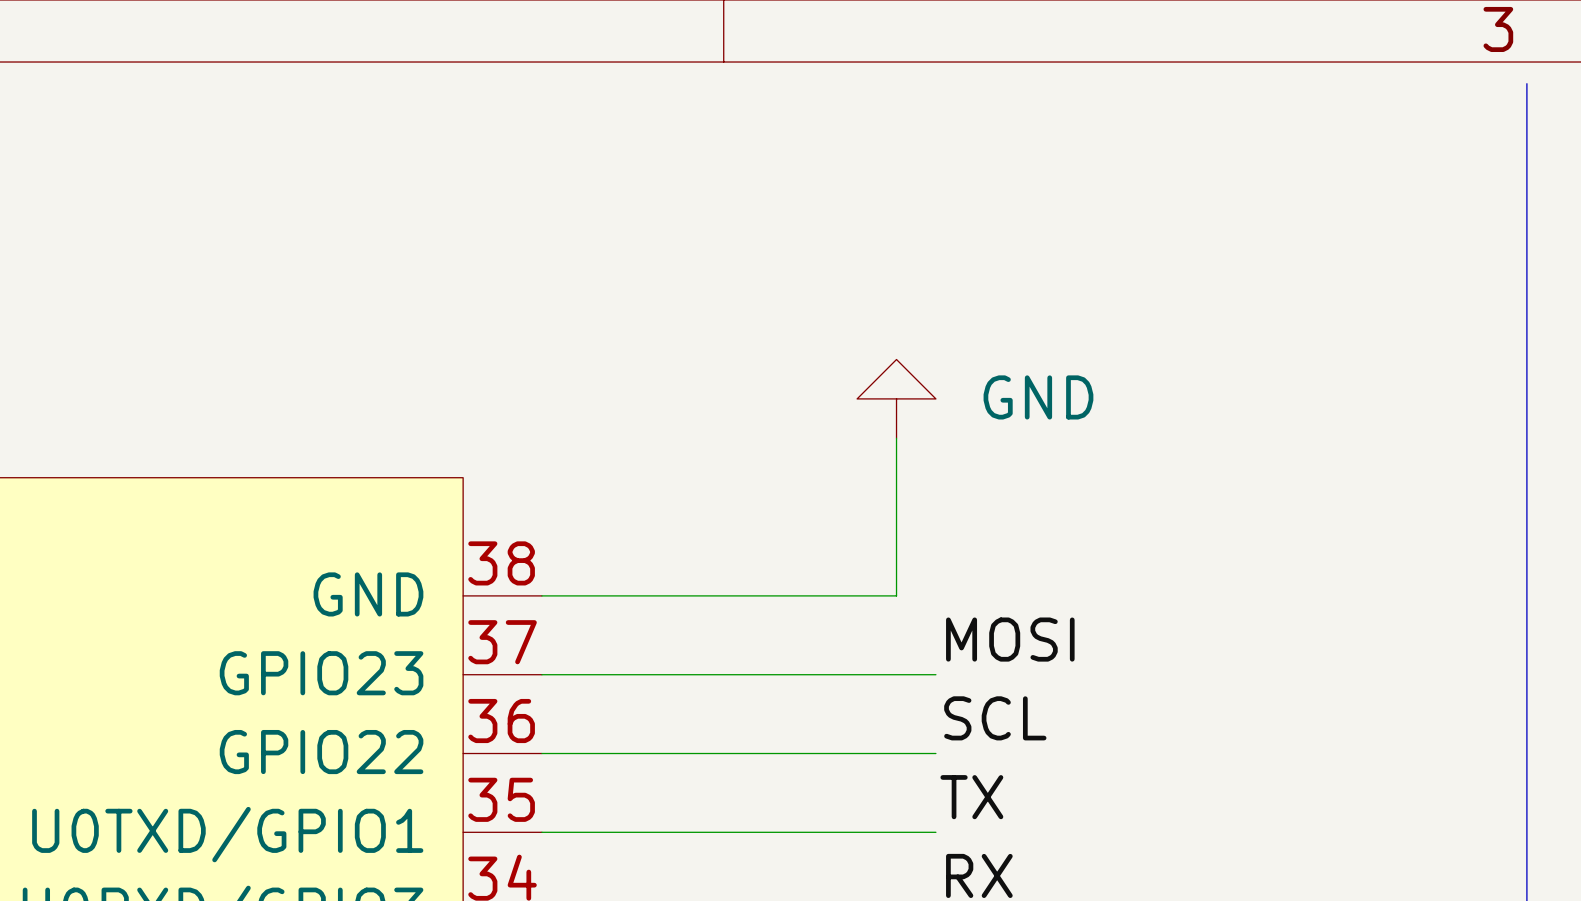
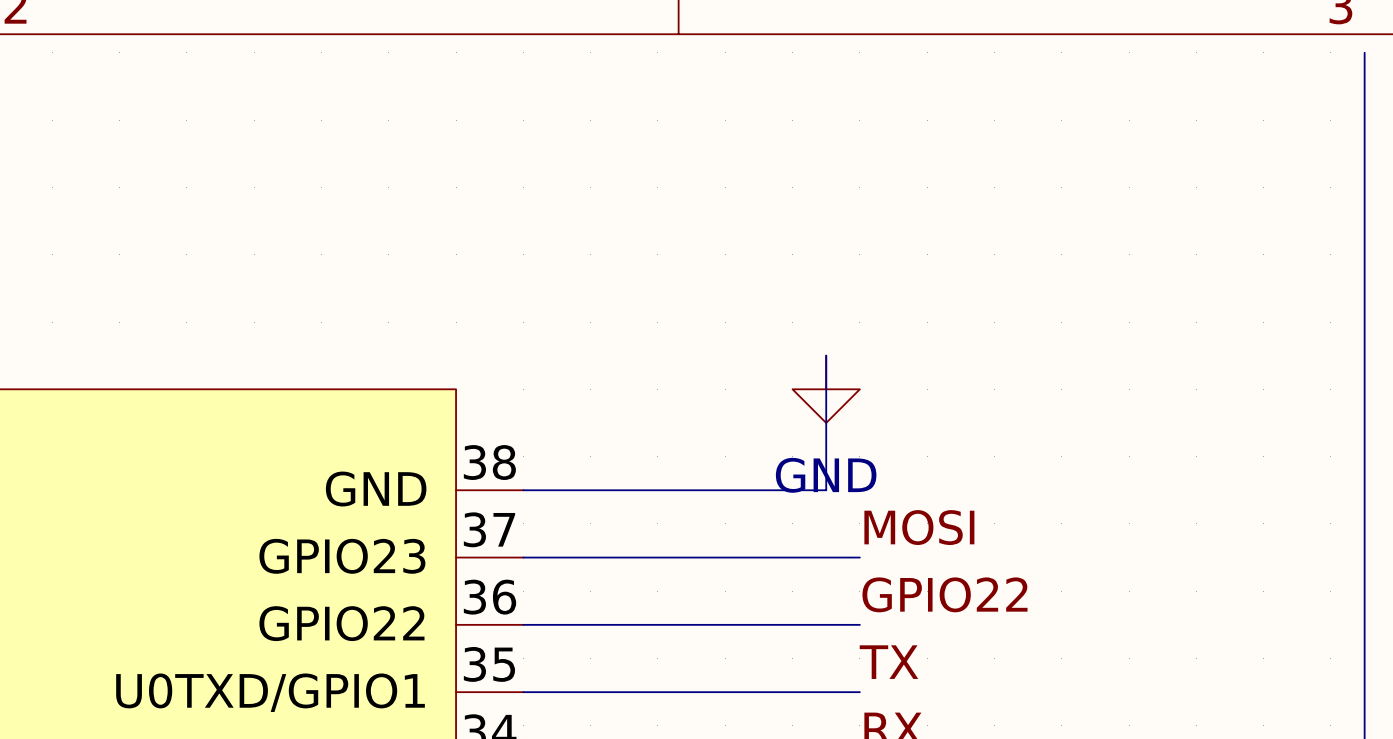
power symbol text position: GND (1038, 397) -> GND (826, 475)
power symbol rotation: 0° (896, 398) -> 180° (826, 389)
power symbol position: GND (896, 398) -> GND (826, 389)
label: SCL (995, 718) -> GPIO22 (944, 594)

